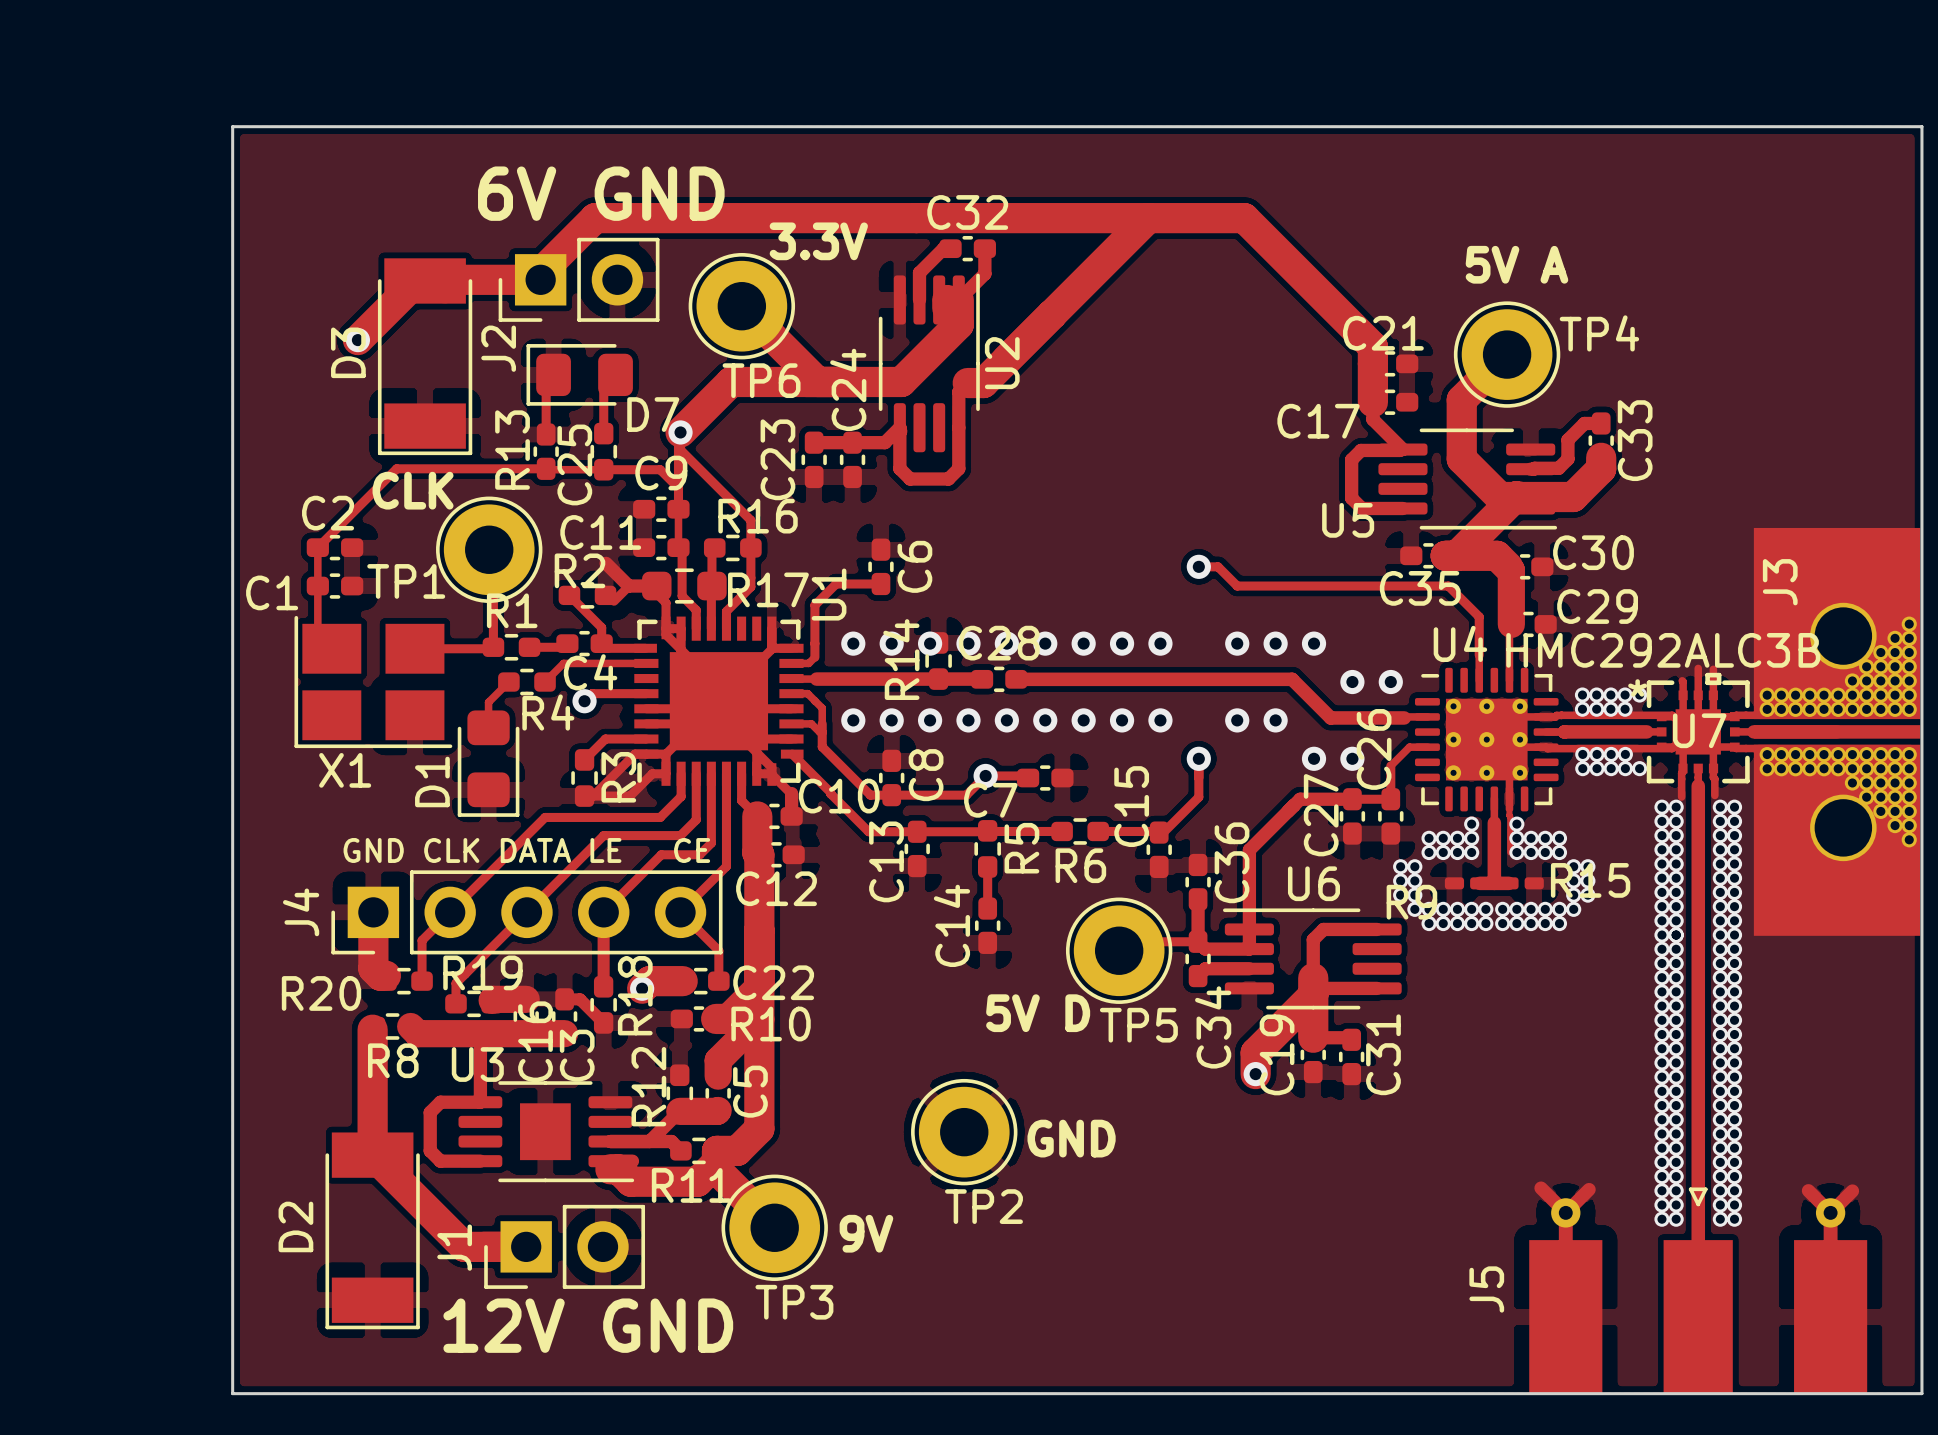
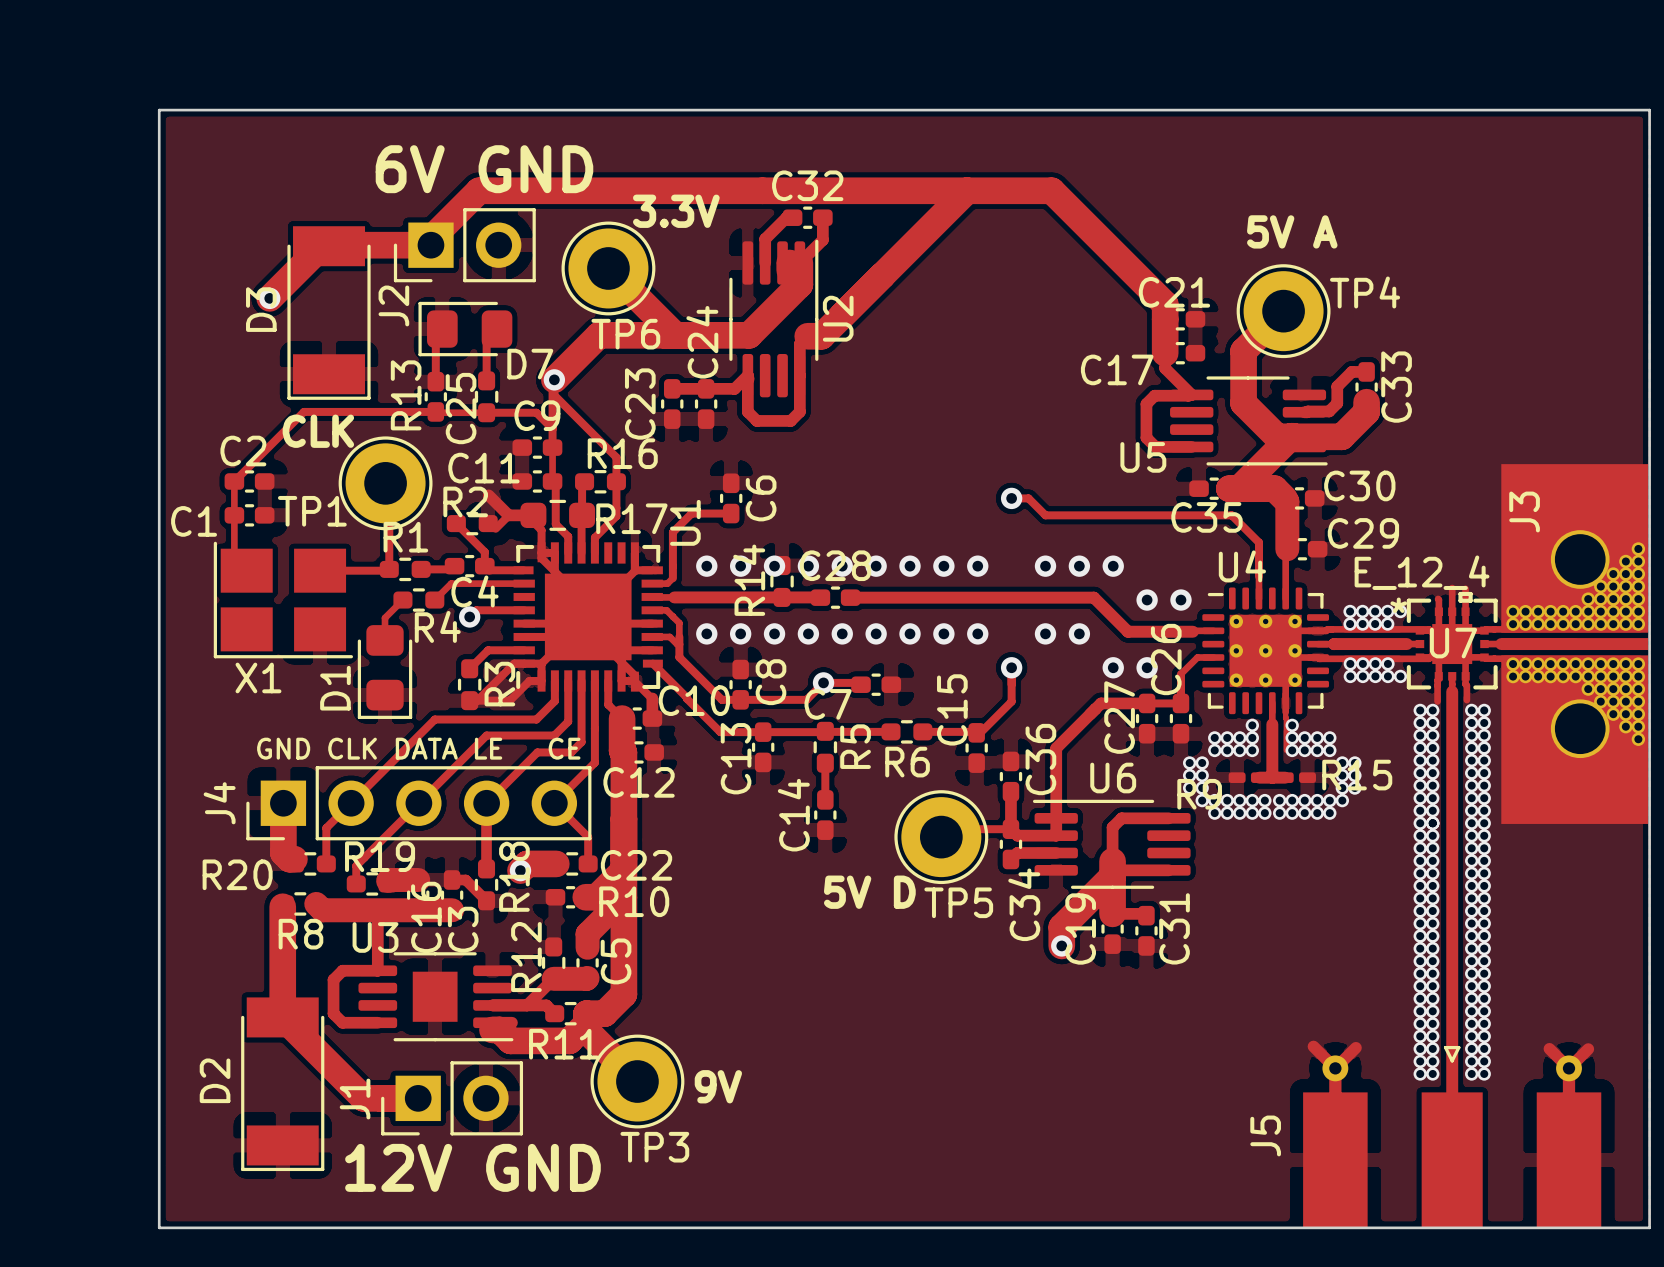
U7 value: HMC292ALC3B (1663, 650) -> E_12_4 (1422, 572)
TP2: (964, 1132) -> none
text: GND (1071, 1138) -> none

